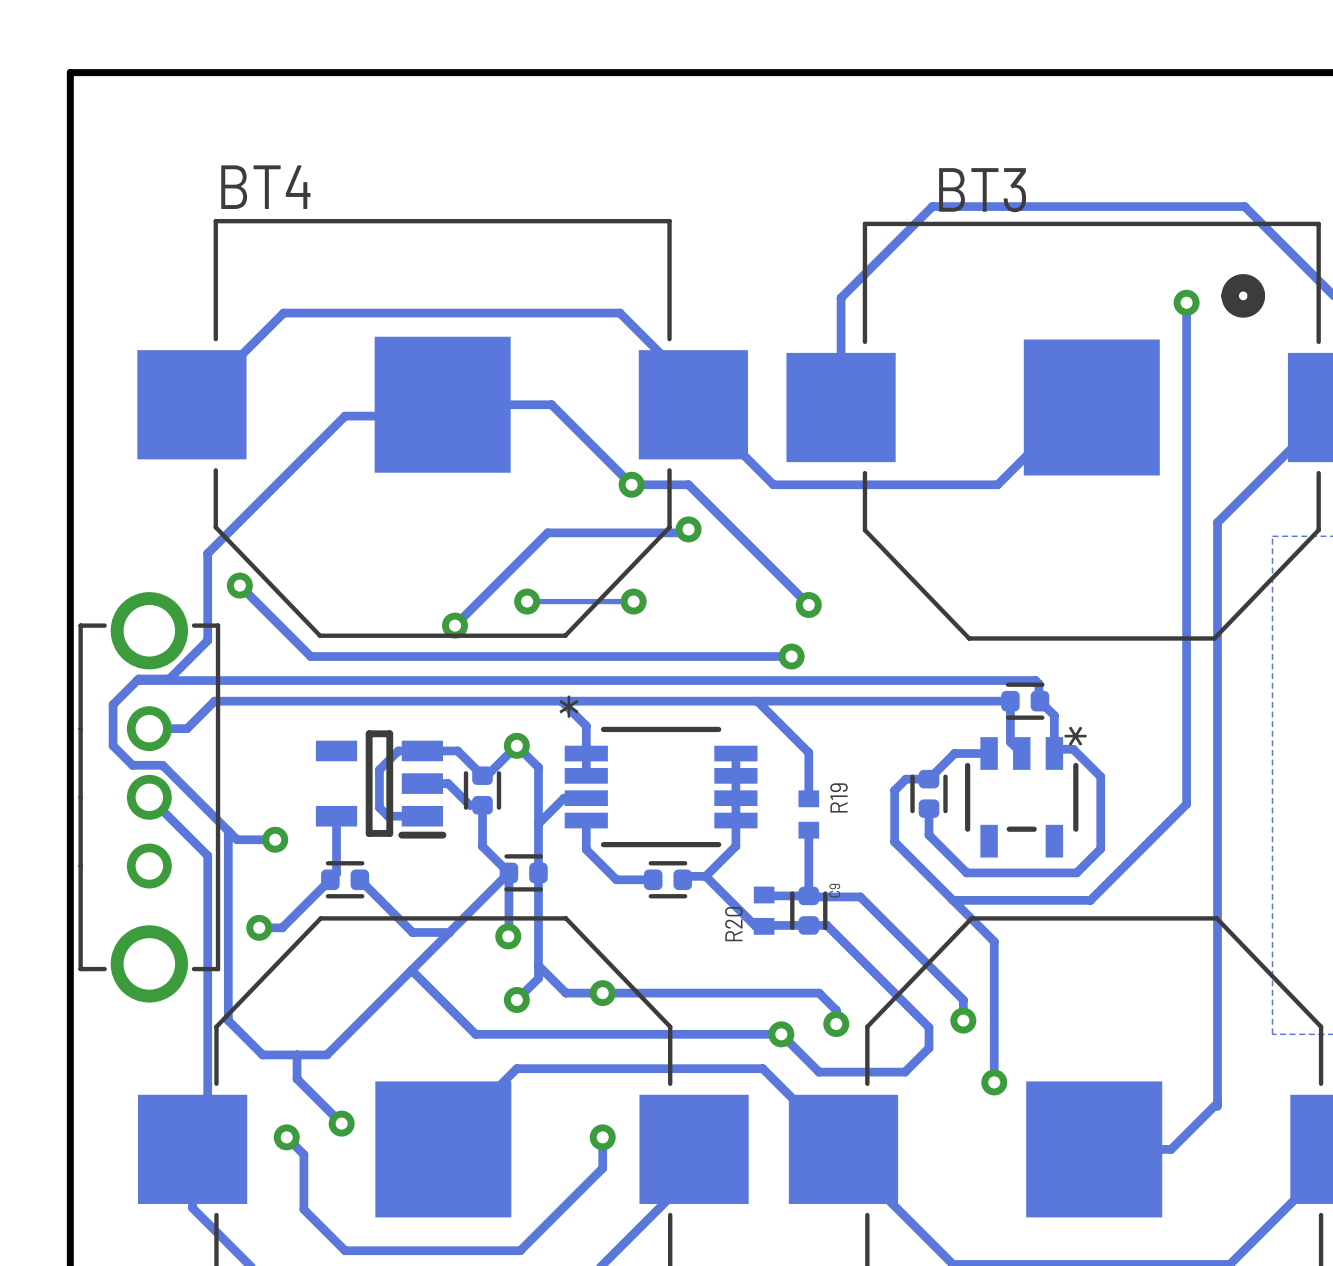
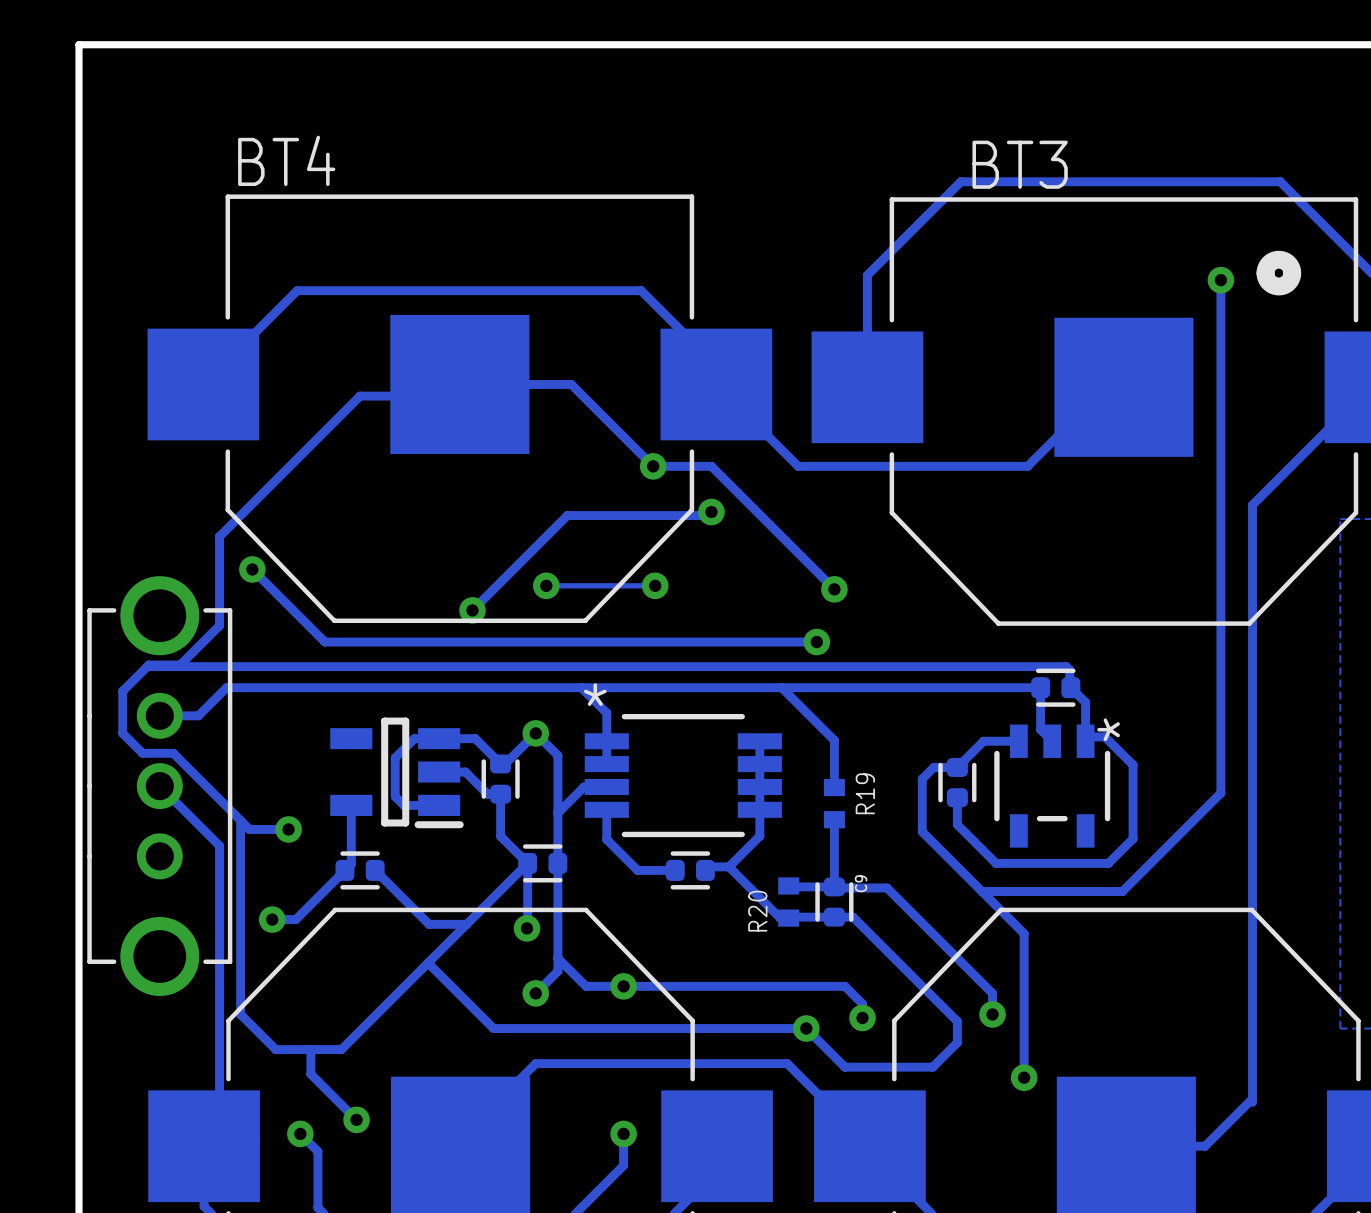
zone outline: (1303, 536) (1272, 536) (1272, 1034) (1303, 1034) -> (1340, 519) (1340, 1028)

